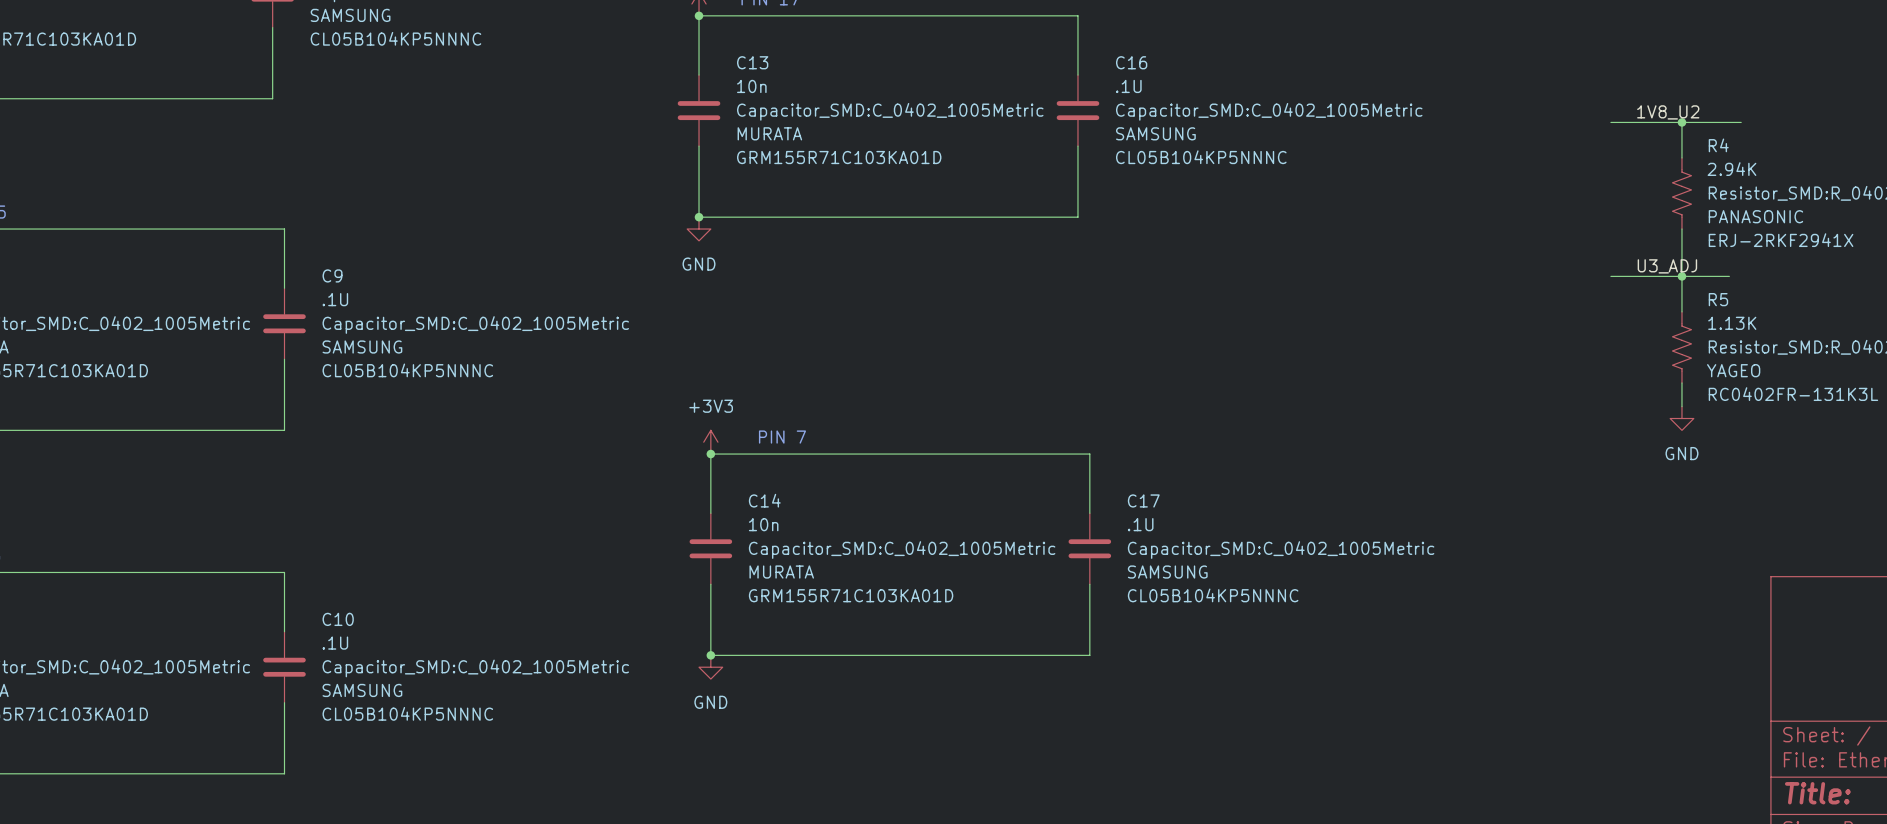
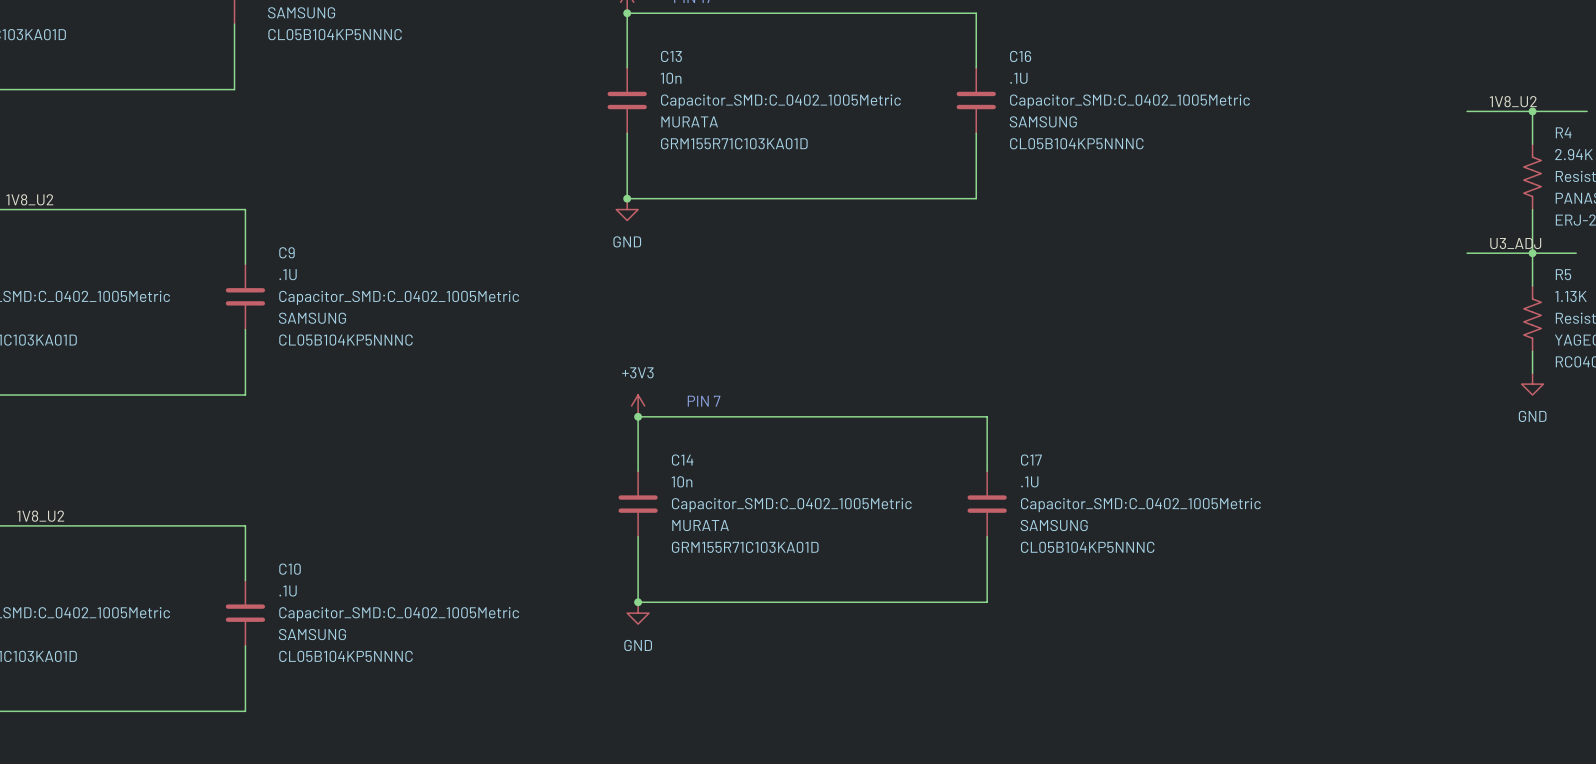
label: none -> 1V8_U2 (29, 199)
label: none -> 1V8_U2 (40, 516)

